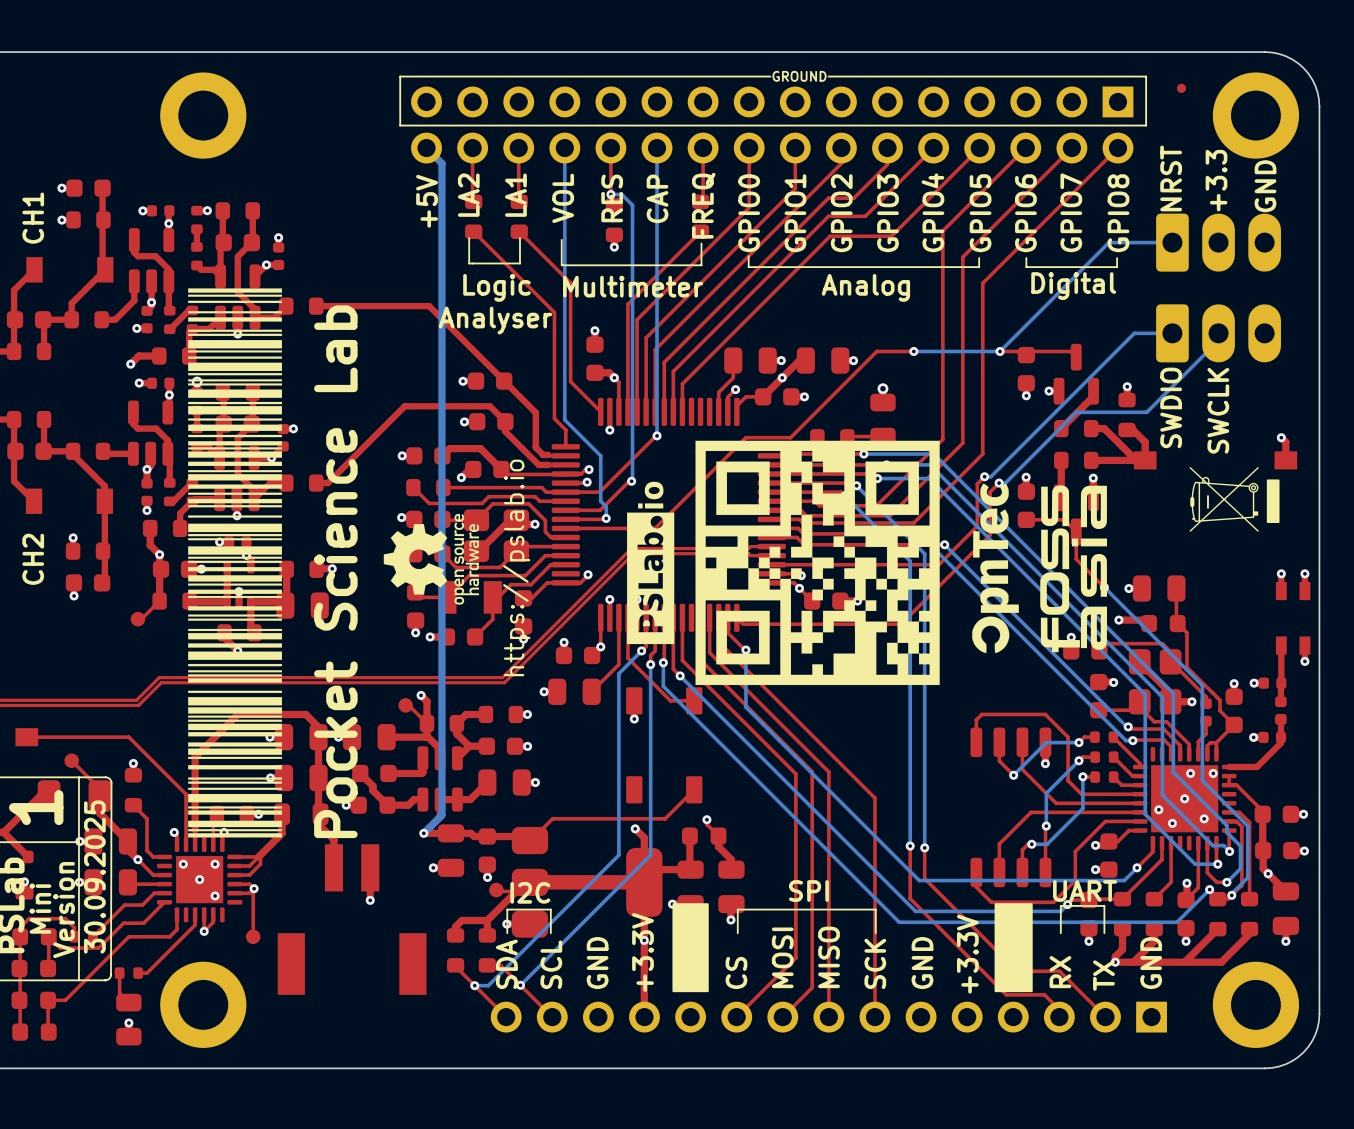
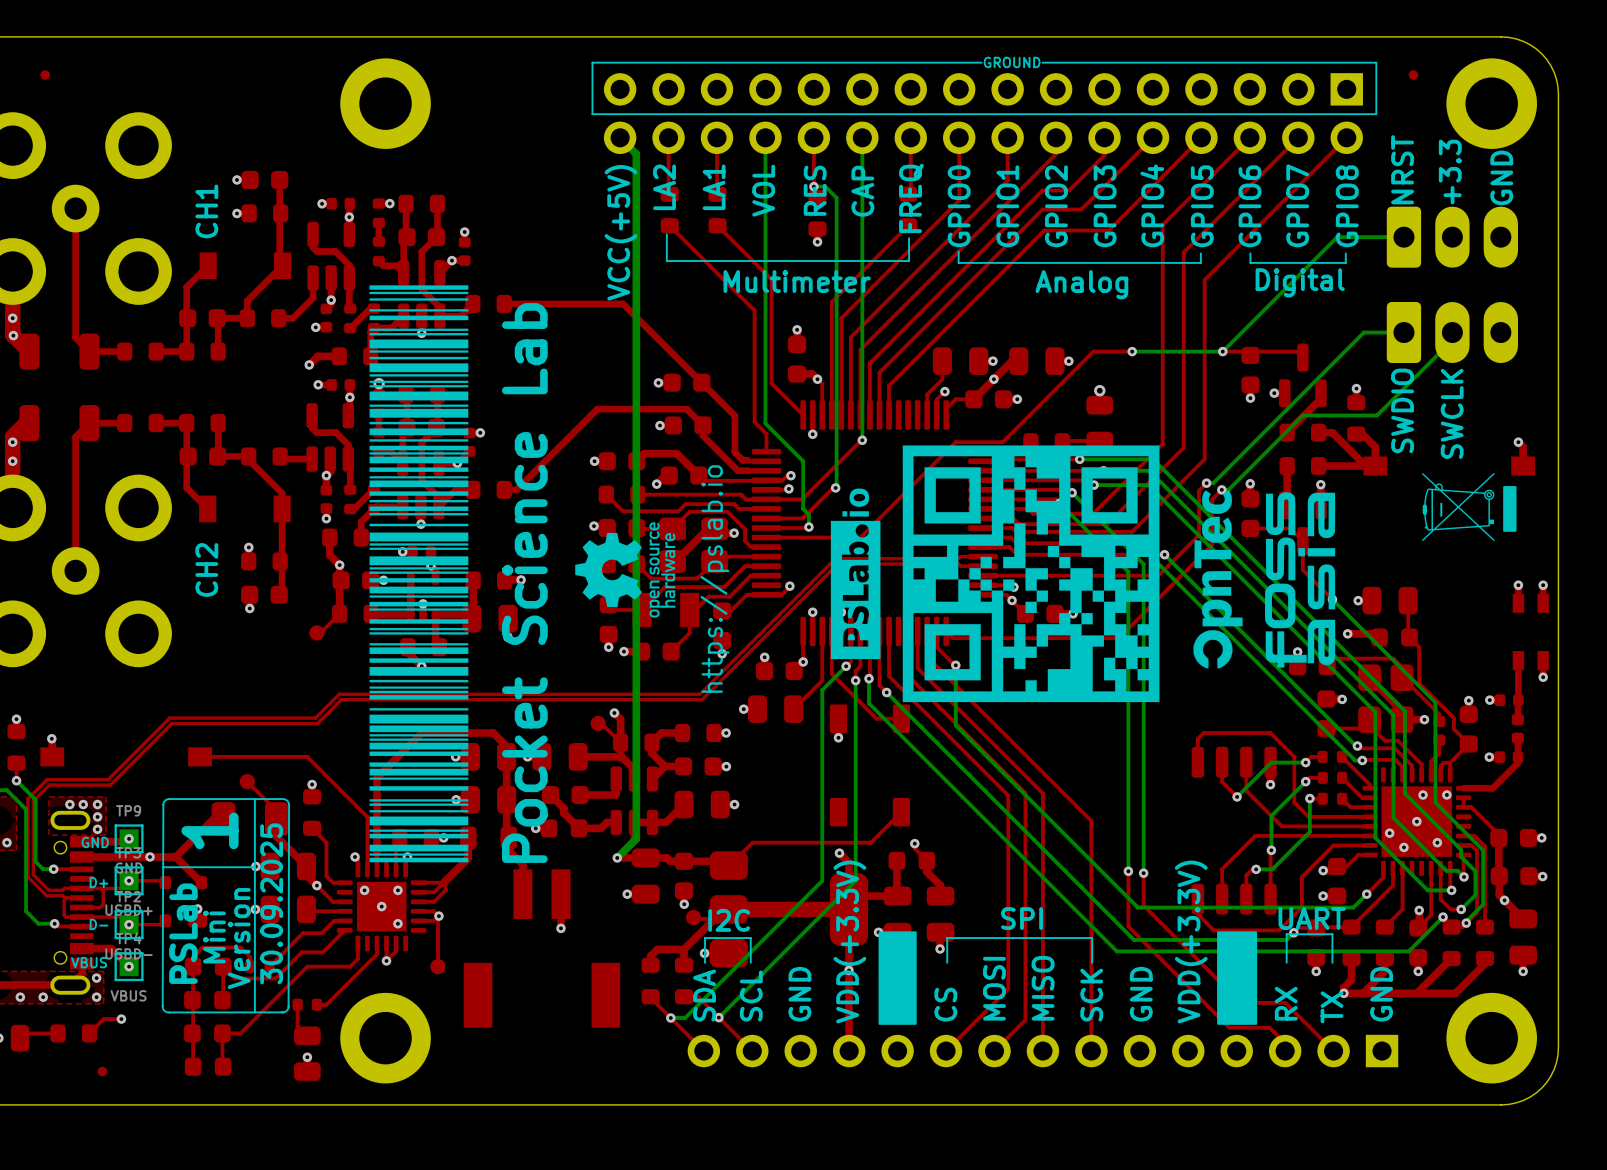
text: +5V (427, 201) -> none
text: none -> VCC(+5V) (621, 232)
line: (519, 238) (519, 263) (469, 263) (469, 238) -> none
line: (561, 239) (561, 265) -> (666, 234) (666, 261) (762, 261)
text position: Multimeter (633, 286) -> Multimeter (797, 281)
text: Logic (496, 287) -> none
text: Analyser (495, 320) -> none
text: +3.3V (643, 952) -> VDD(+3.3V) (849, 941)
text: +3.3V (967, 954) -> VDD(+3.3V) (1191, 941)

